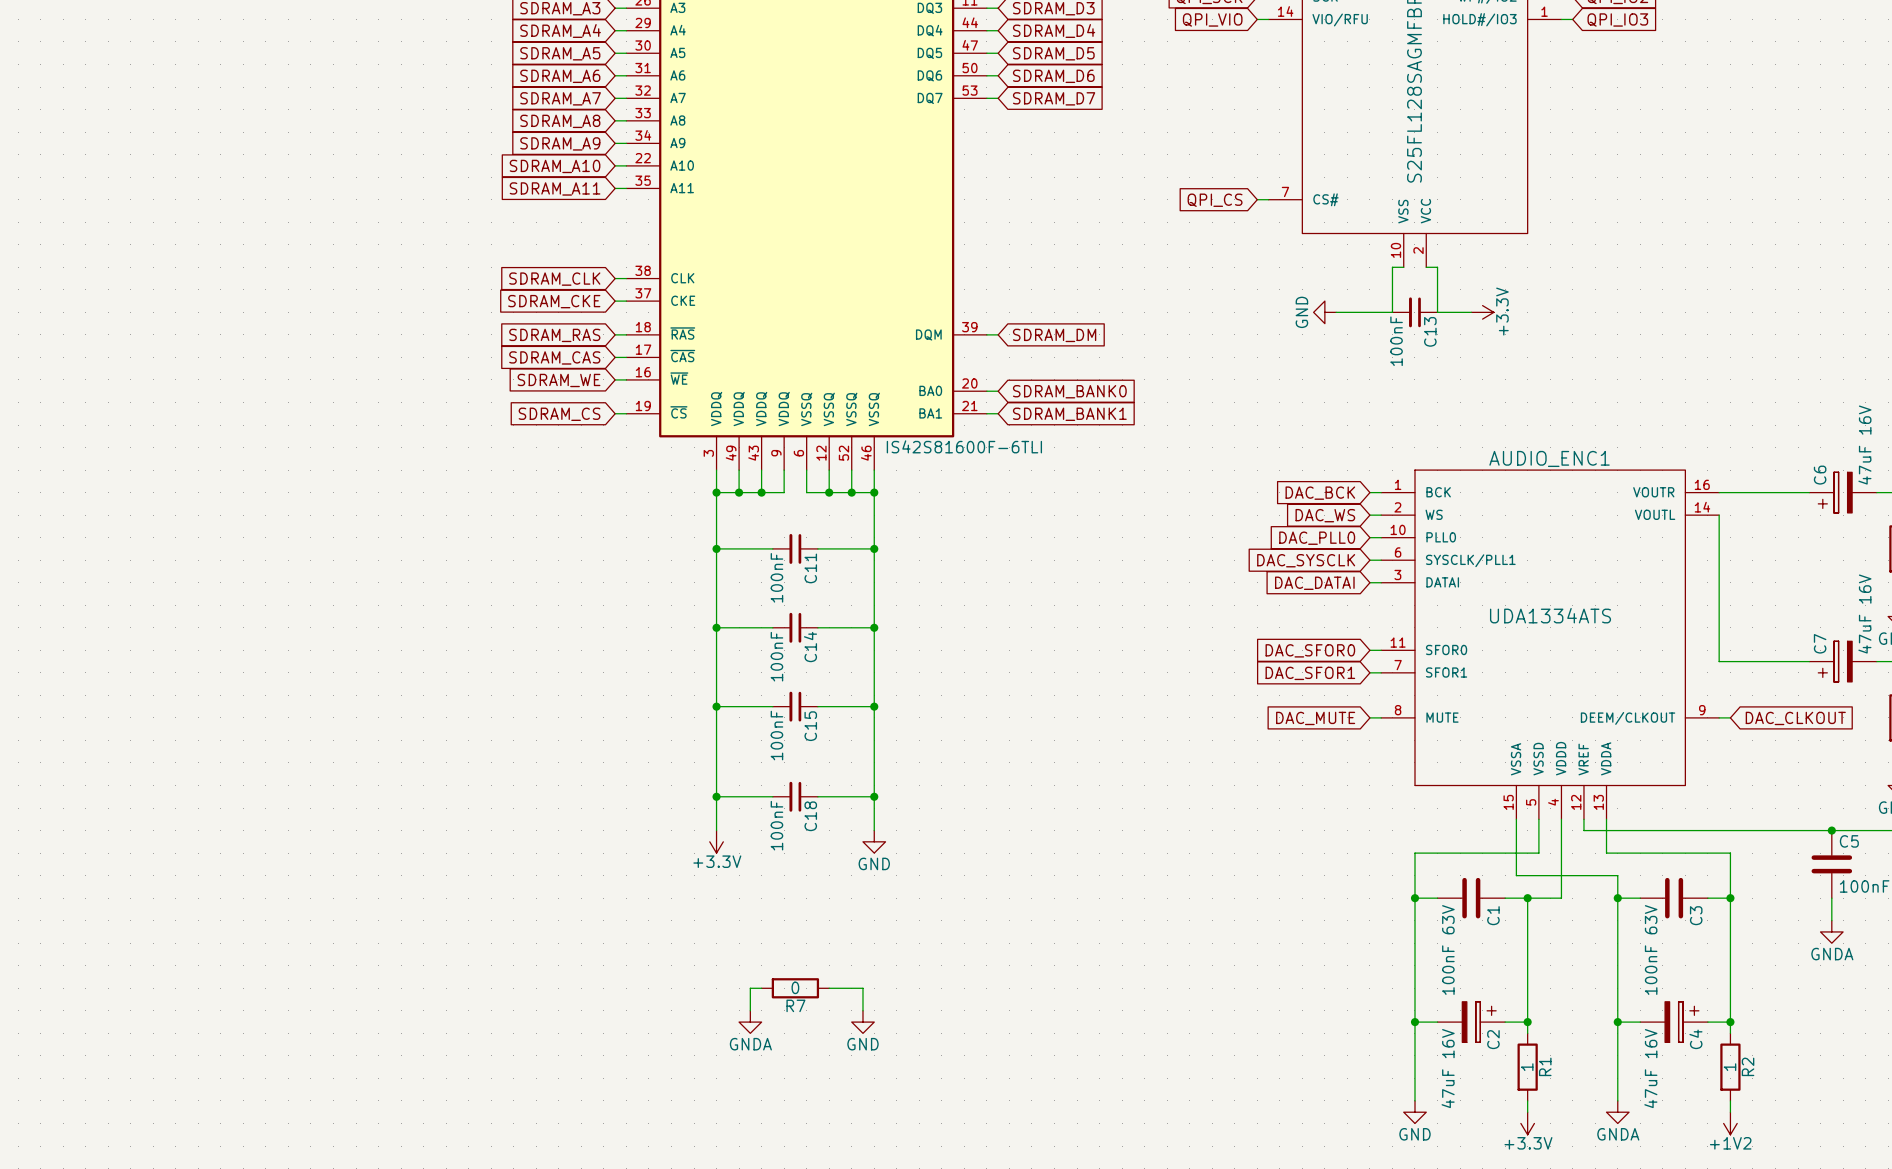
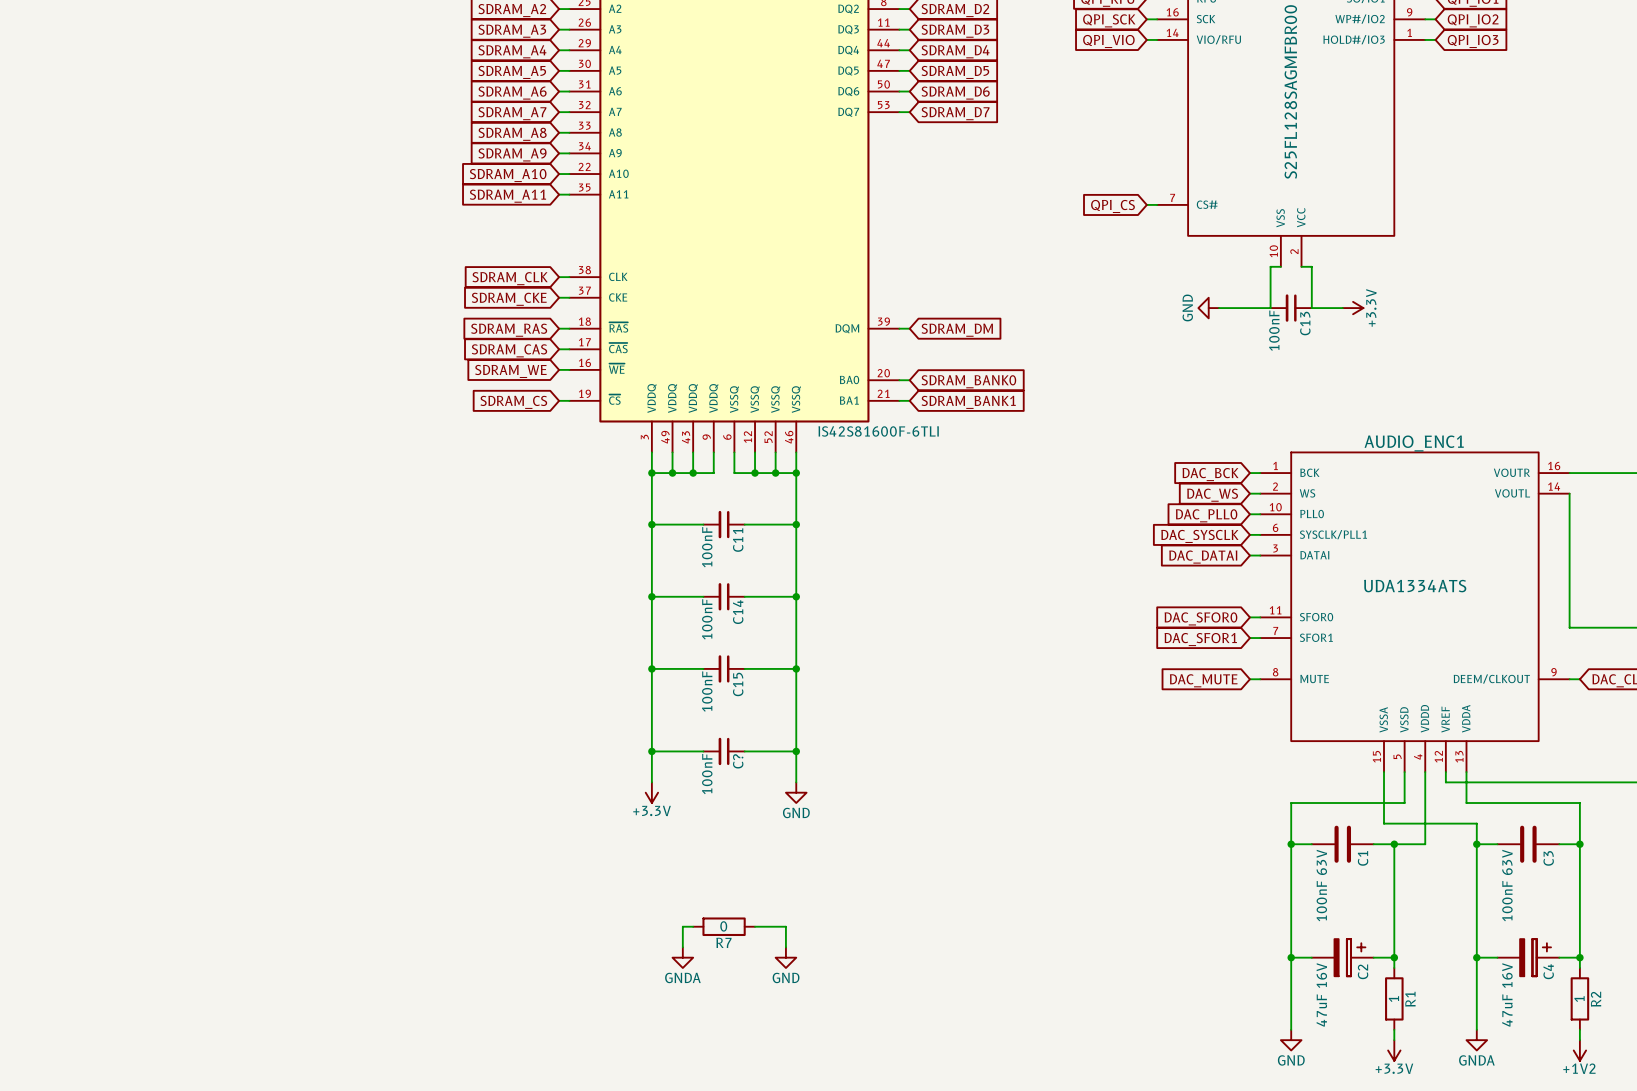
C18 name: C18 (810, 816) -> C? (738, 761)

